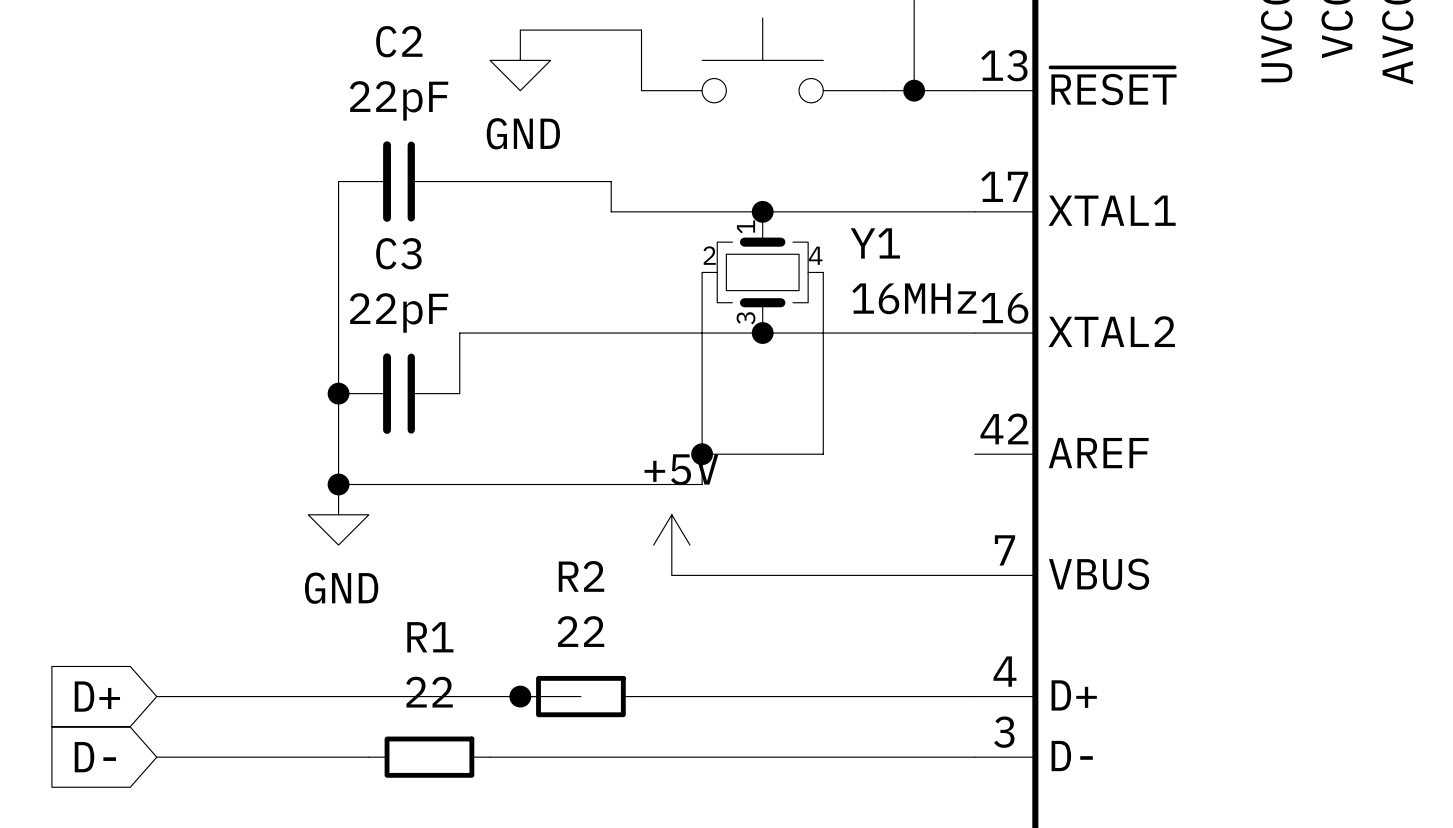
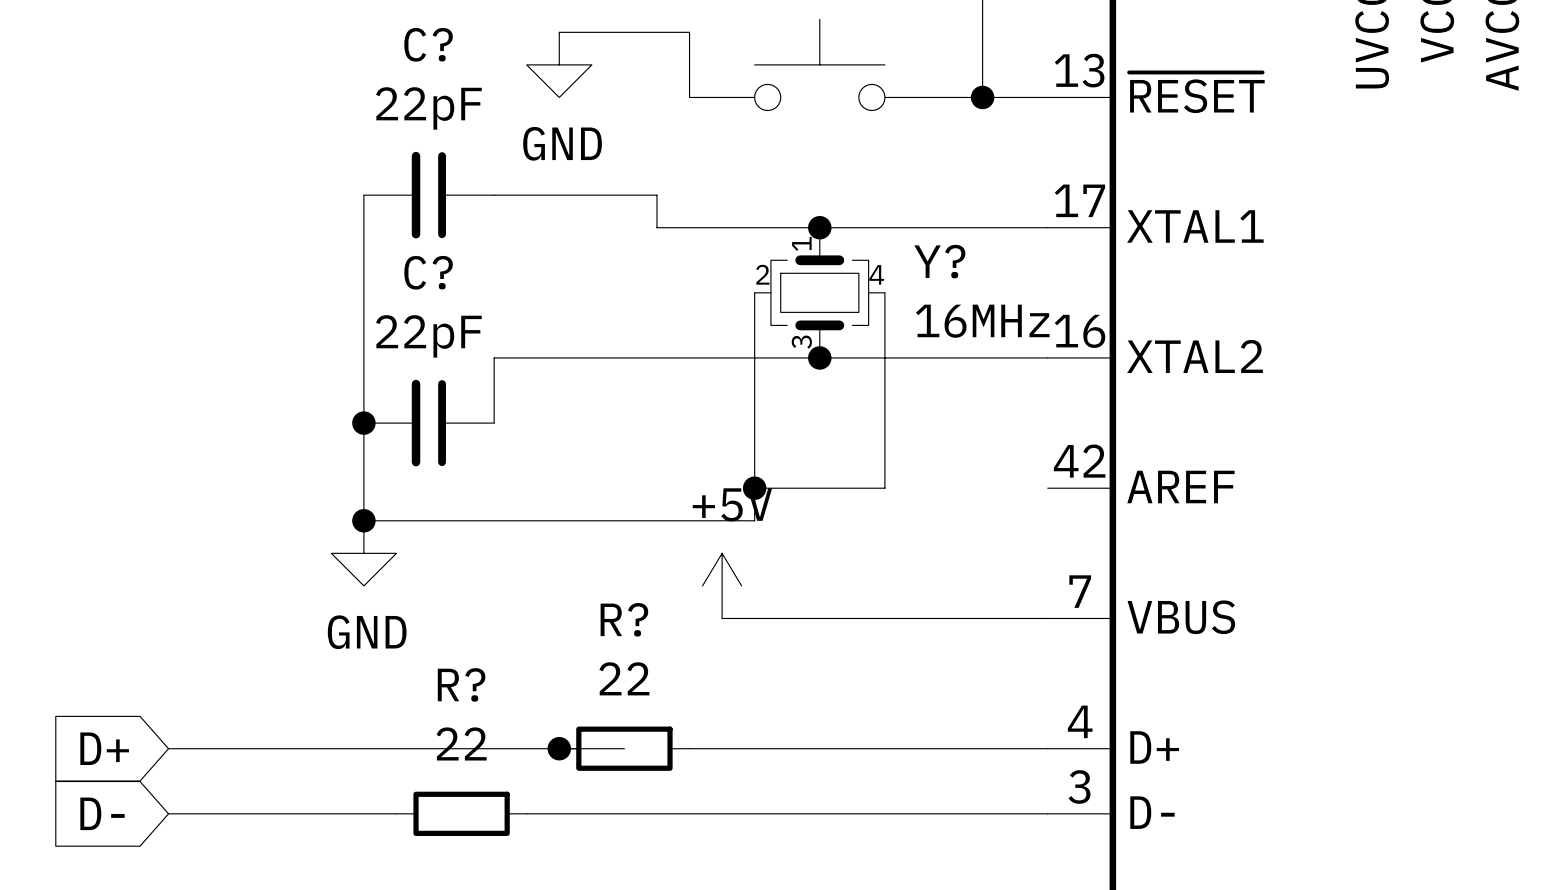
C2 name: C2 (399, 41) -> C? (428, 44)
Y1 name: Y1 (875, 243) -> Y? (939, 261)
C3 name: C3 (398, 253) -> C? (428, 272)
R2 name: R2 (581, 576) -> R? (624, 619)
R1 name: R1 (430, 637) -> R? (461, 684)

